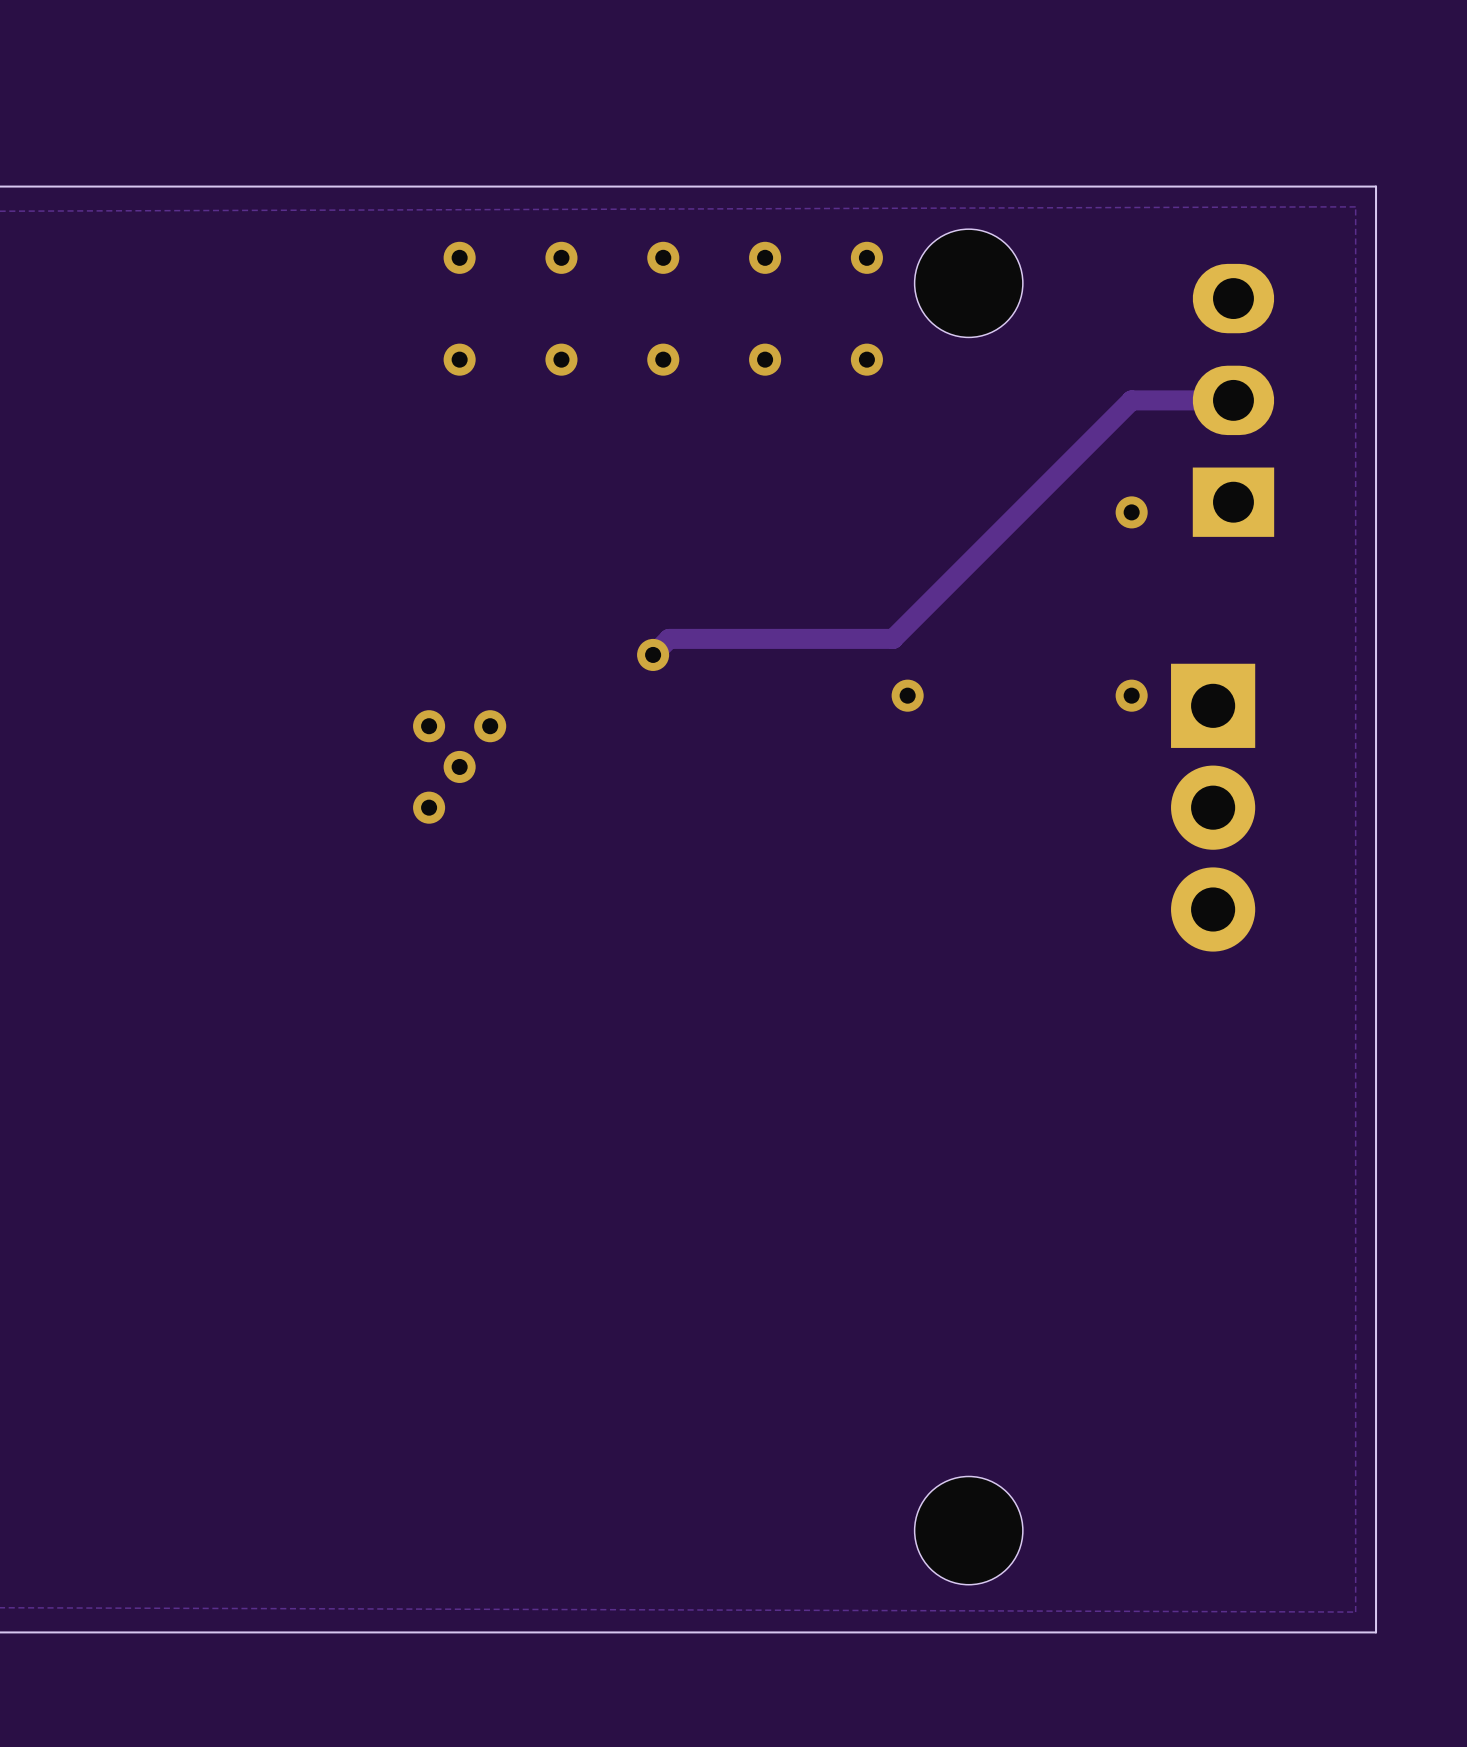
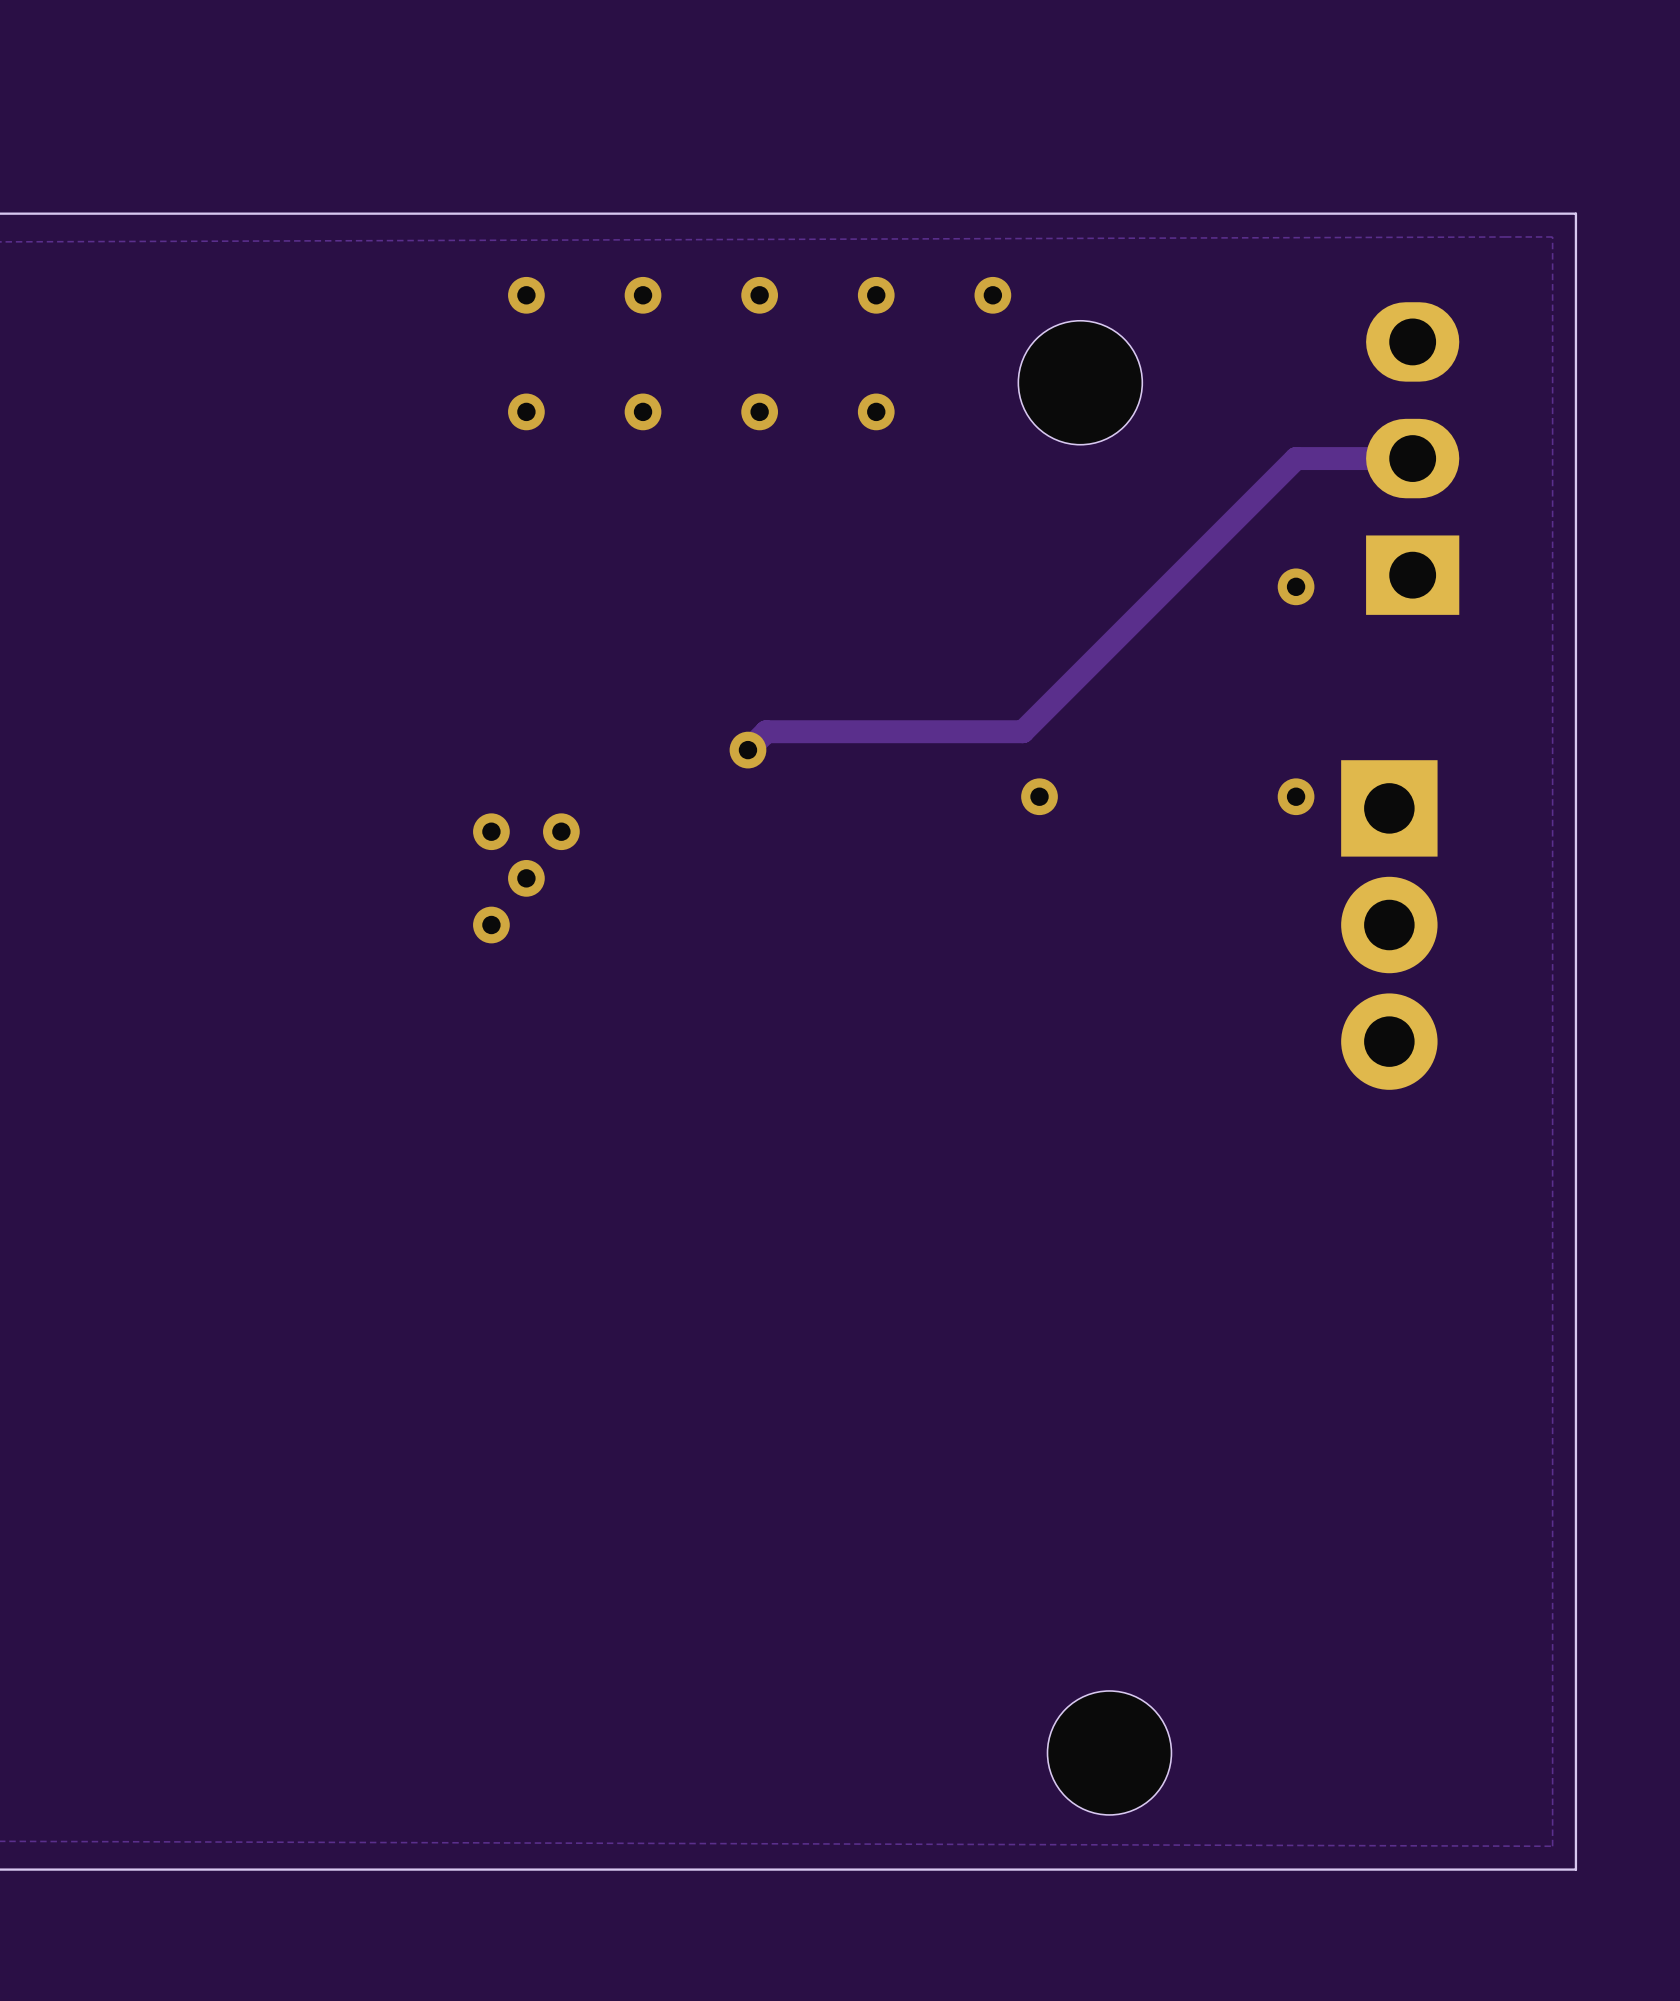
part position: (968, 283) -> (1080, 382)
via: (866, 359) -> none

